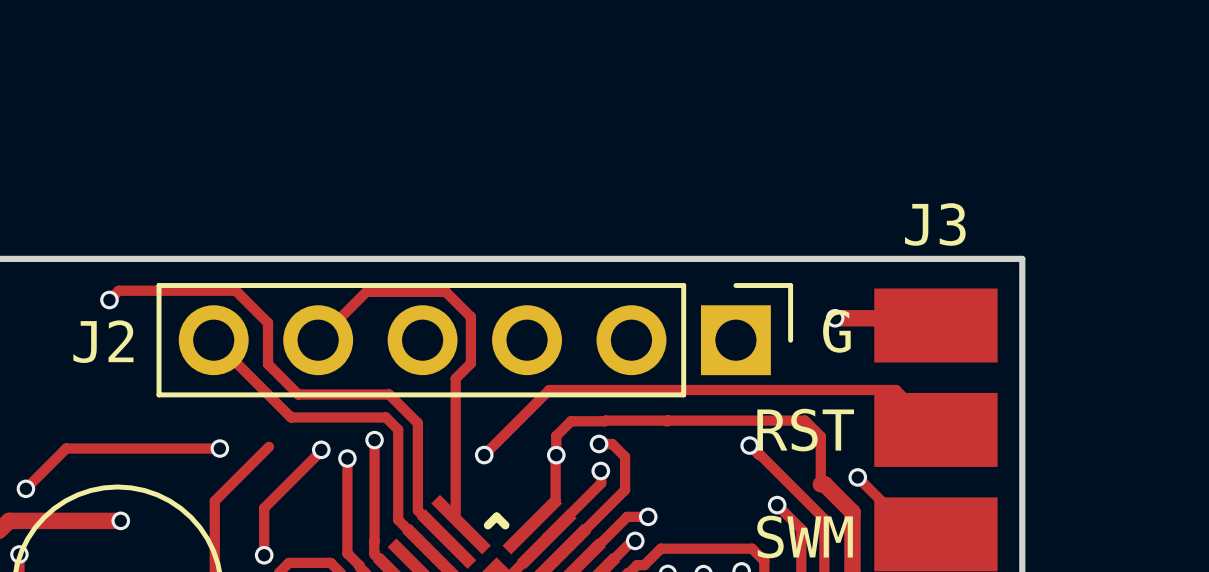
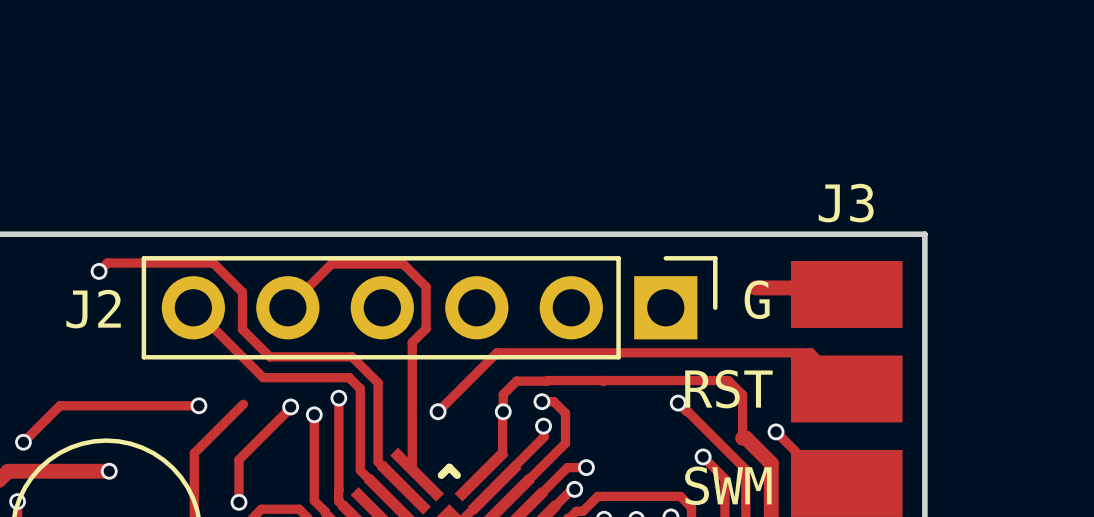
via: (835, 318) -> none

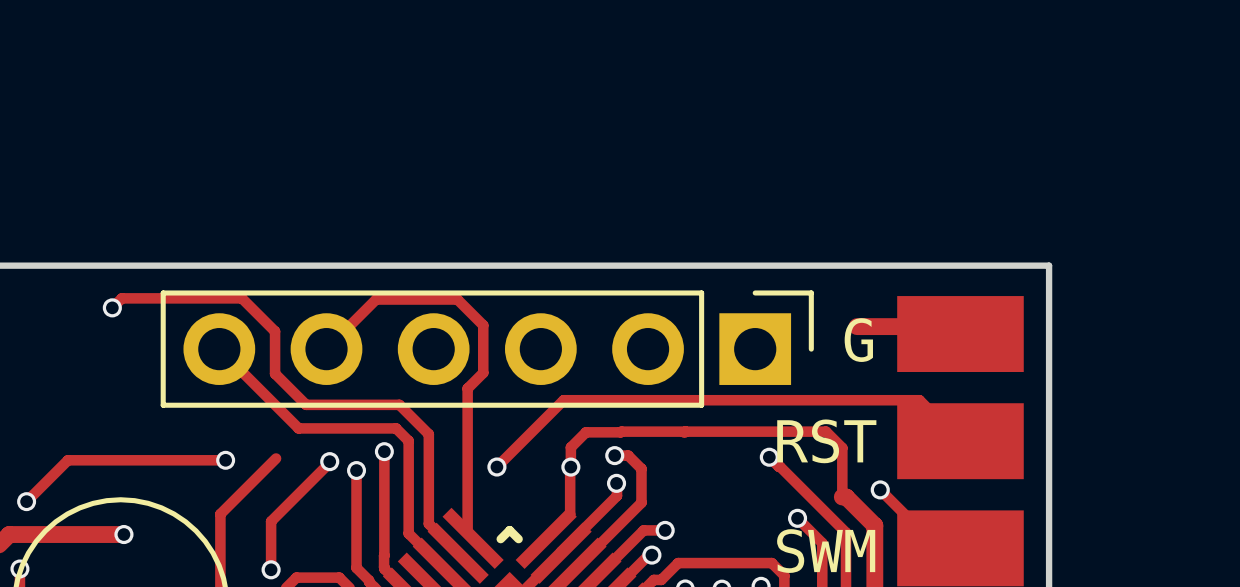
J3 name: J3 (846, 203) -> none
J2 name: J2 (93, 309) -> none

